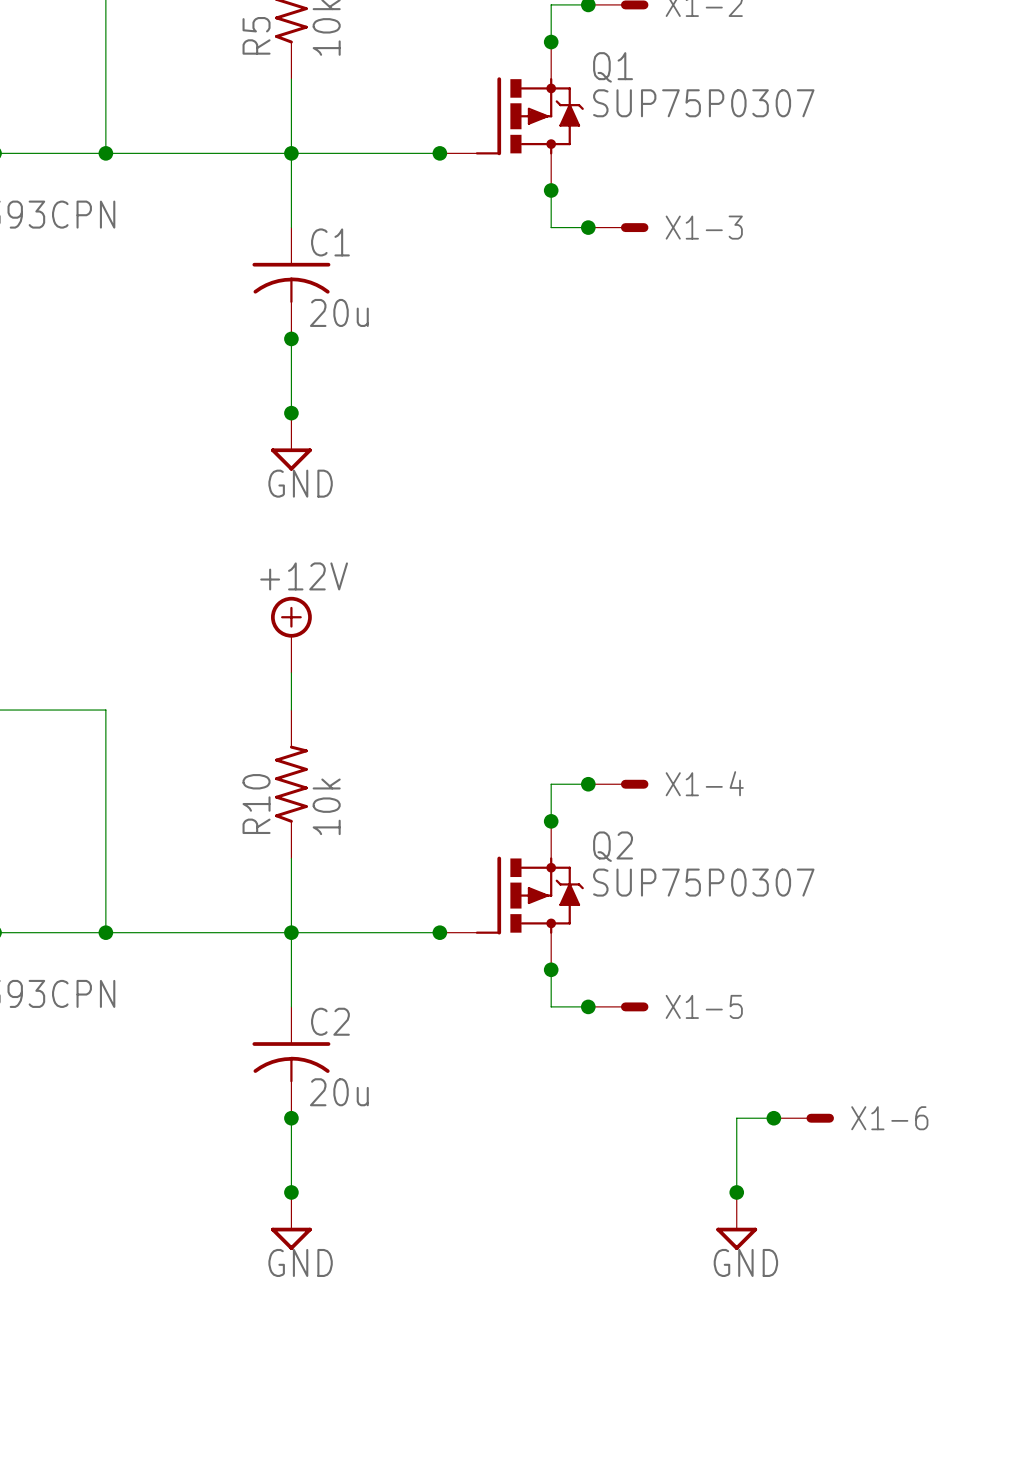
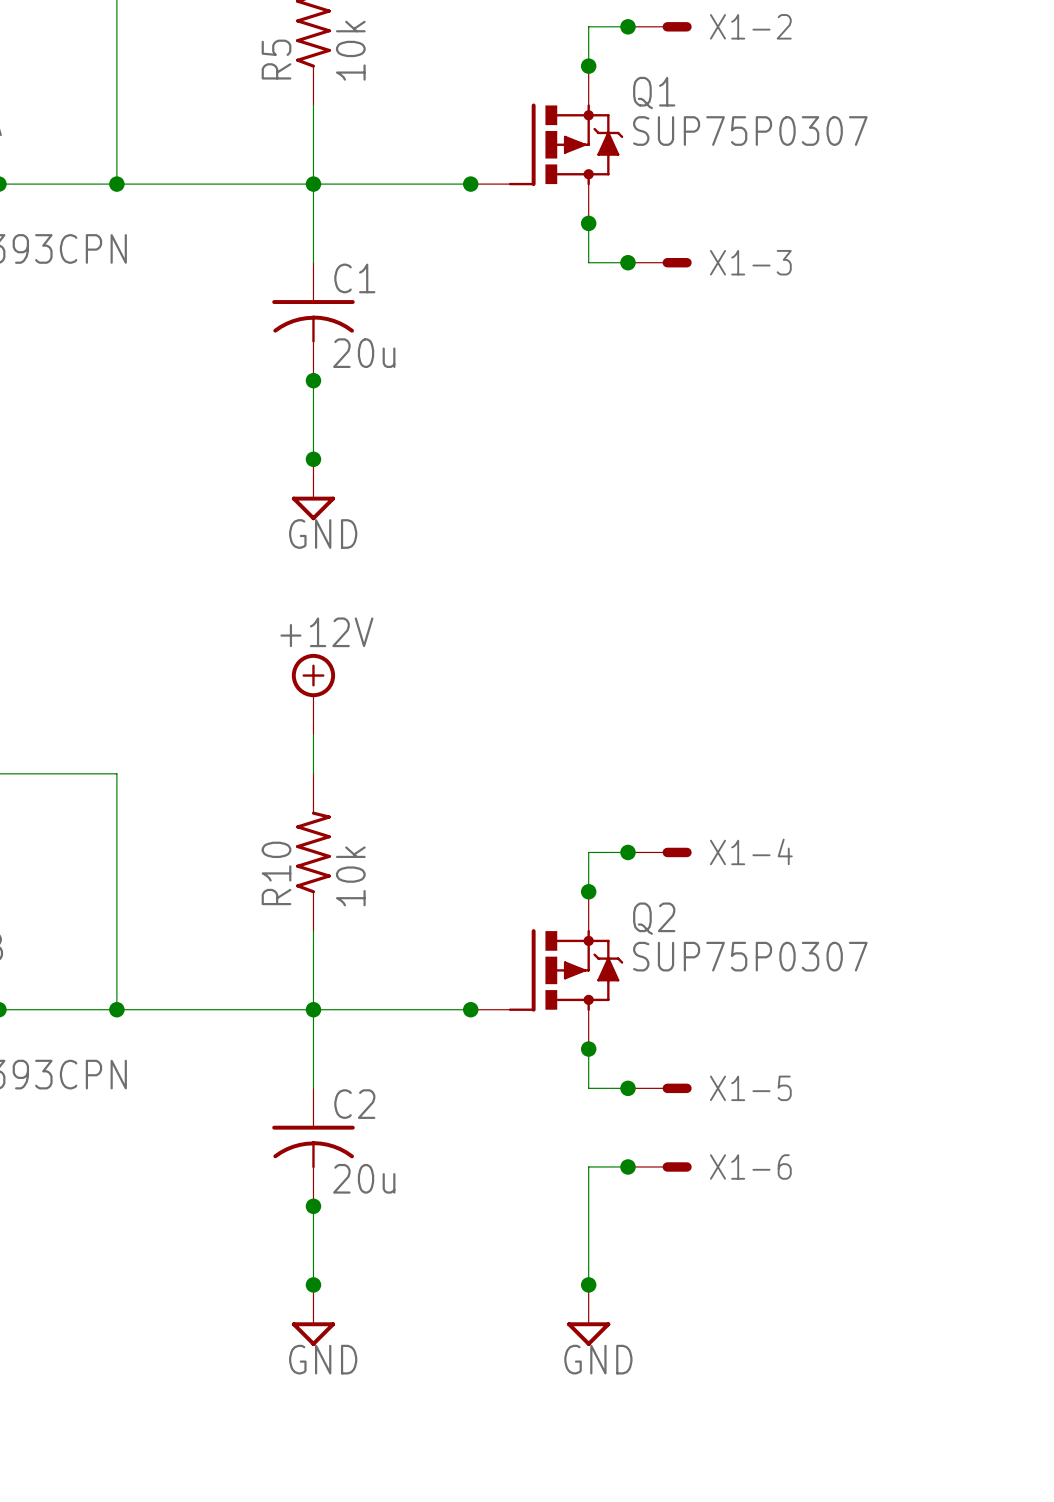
wire: none -> (628, 1166) (588, 1166) (588, 1284)
junction: none -> (628, 1166)
wire: (773, 1118) (736, 1118) (736, 1192) -> none
junction: (773, 1118) -> none
X1-6 position: (803, 1118) -> (659, 1166)
junction: none -> (588, 1284)
junction: (736, 1192) -> none
power symbol position: GND (736, 1221) -> GND (588, 1315)

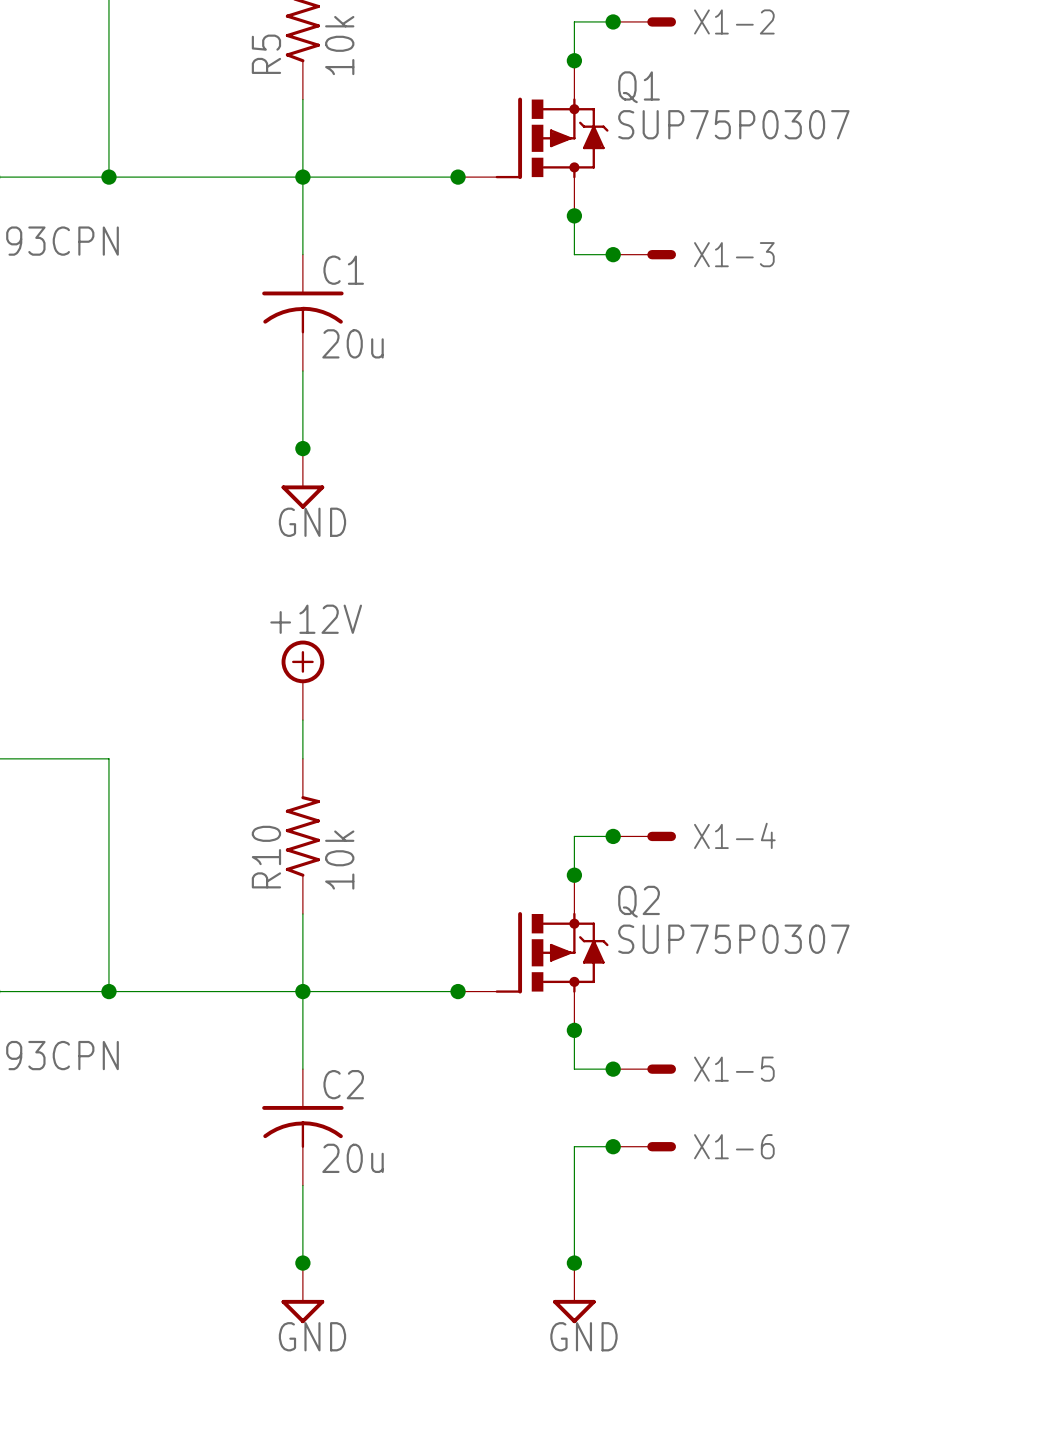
junction: (313, 380) -> none
junction: (313, 1206) -> none

